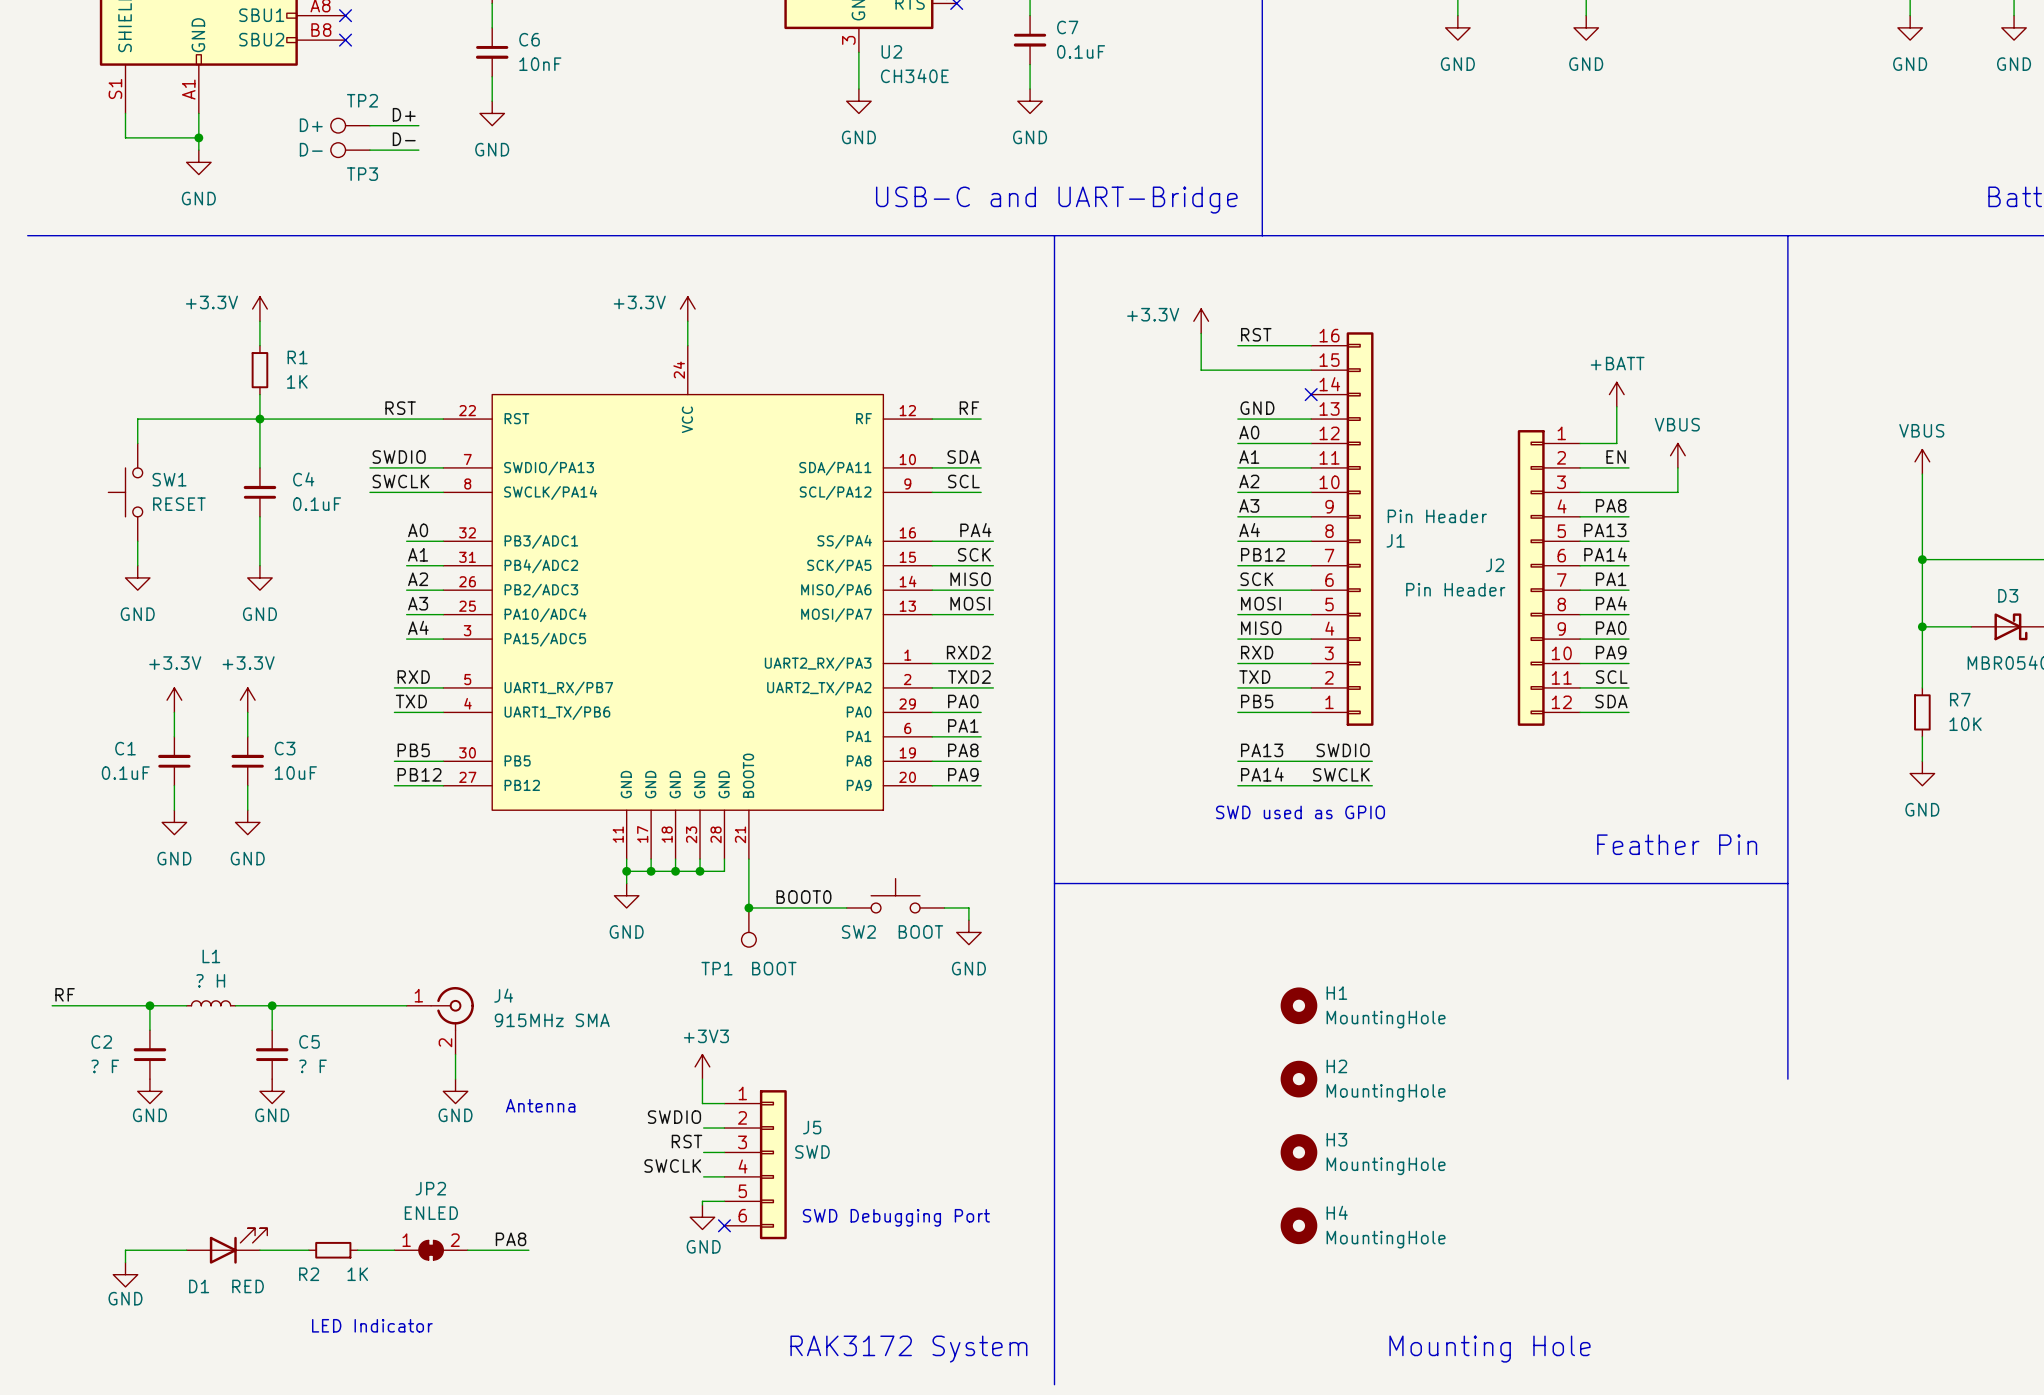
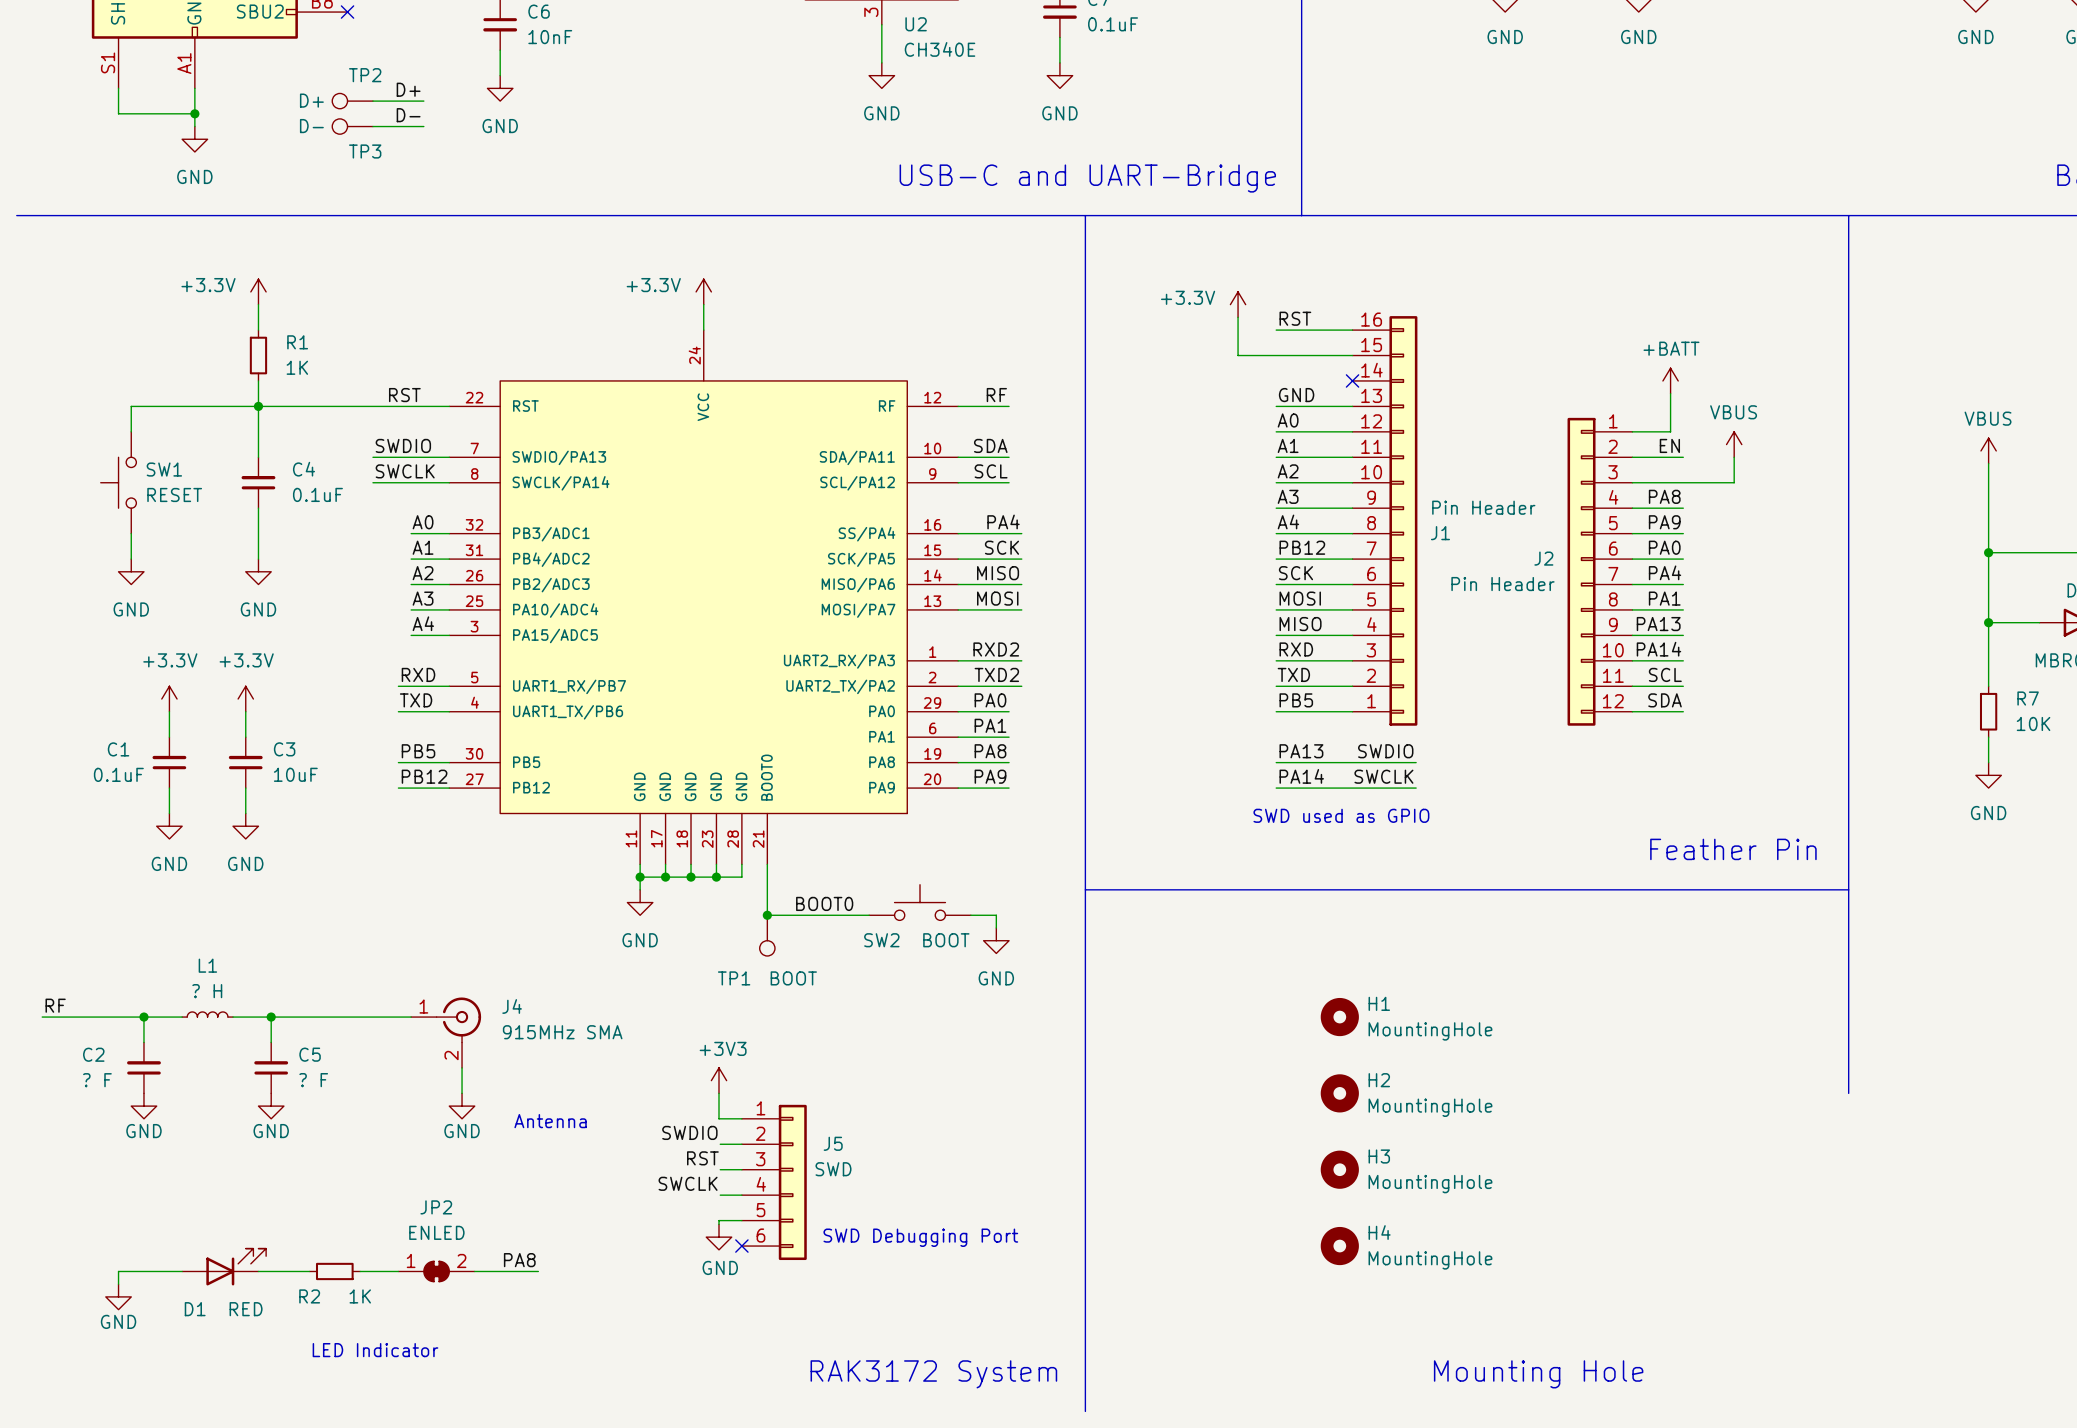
label: PA13 (1605, 530) -> PA9 (1664, 522)
label: PA14 (1605, 554) -> PA0 (1664, 547)
label: PA1 (1611, 579) -> PA4 (1665, 572)
label: PA4 (1611, 603) -> PA1 (1664, 598)
label: PA0 (1611, 628) -> PA13 (1658, 624)
label: PA9 (1611, 652) -> PA14 (1658, 649)

